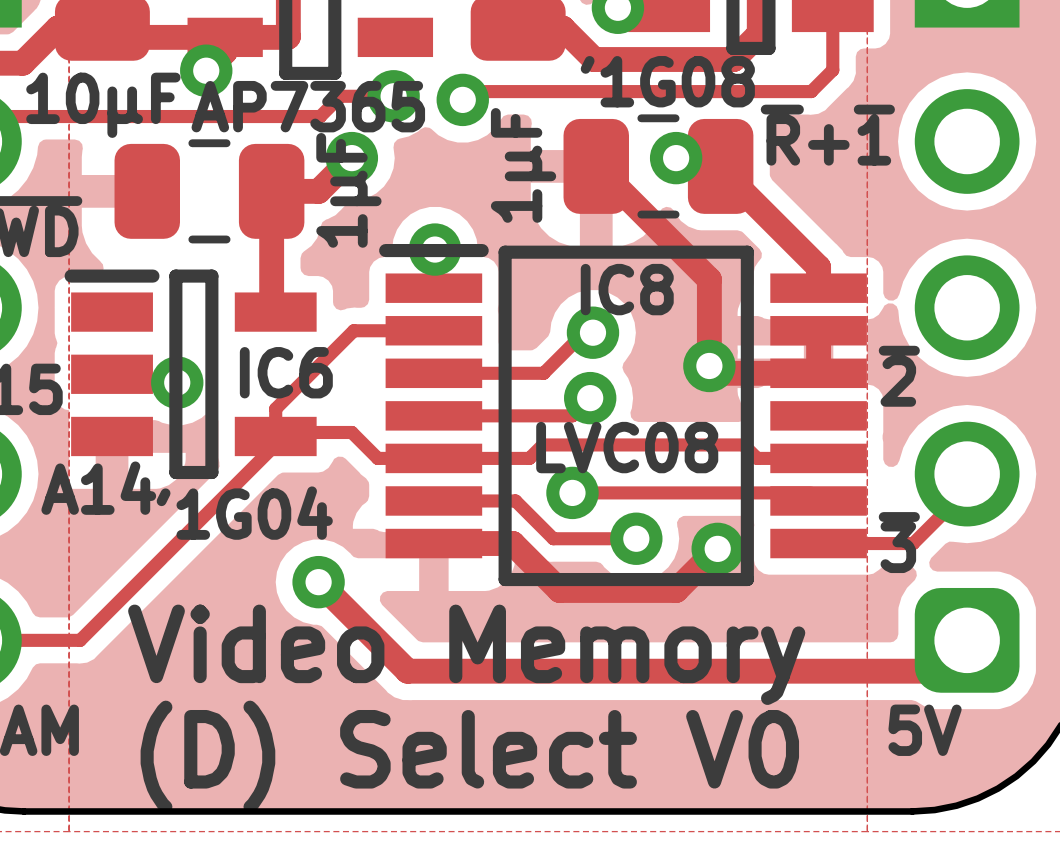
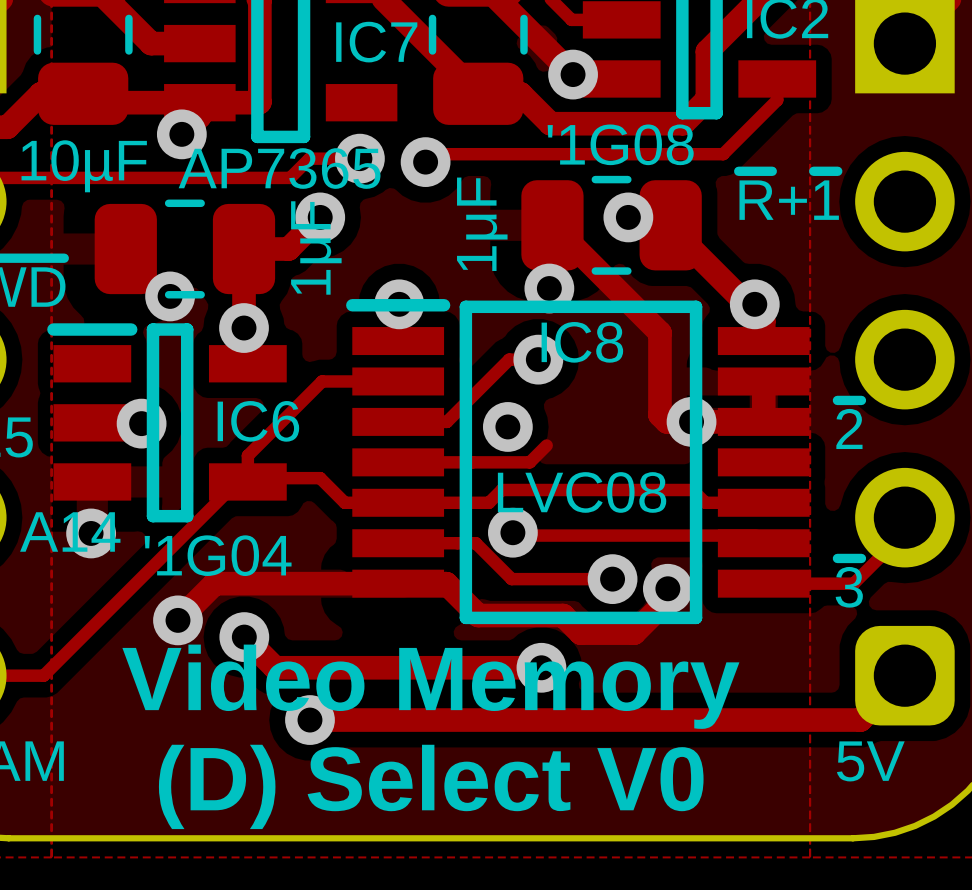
track: (832, 34) (832, 70) (811, 91) (775, 91) -> (777, 100) (723, 154)
via: none -> (549, 288)
via: none -> (170, 296)
via: none -> (754, 304)
via: none -> (244, 328)
track: (592, 332) (584, 332) (543, 373) (485, 373) -> (538, 359) (509, 359) (446, 421)
via position: (592, 332) -> (538, 359)
via position: (709, 365) -> (691, 421)
via position: (177, 382) -> (141, 423)
via position: (590, 398) -> (507, 426)
track: (275, 444) (80, 640) (60, 640) -> (229, 489) (43, 675)
via: none -> (91, 533)
via position: (572, 492) -> (512, 532)
via position: (636, 538) -> (612, 579)
track: none -> (398, 583) (214, 583) (178, 620)
track: (484, 543) (512, 543) (559, 590) (676, 590) (717, 548) -> (446, 583) (478, 615) (563, 615) (580, 633) (634, 633) (676, 590)
via: none -> (178, 620)
track: (318, 582) (407, 671) (936, 671) -> (309, 720) (860, 720) (875, 705)
via position: (318, 582) -> (244, 637)
track: none -> (244, 637) (275, 667) (541, 667)
via: none -> (541, 667)
via: none -> (309, 720)

